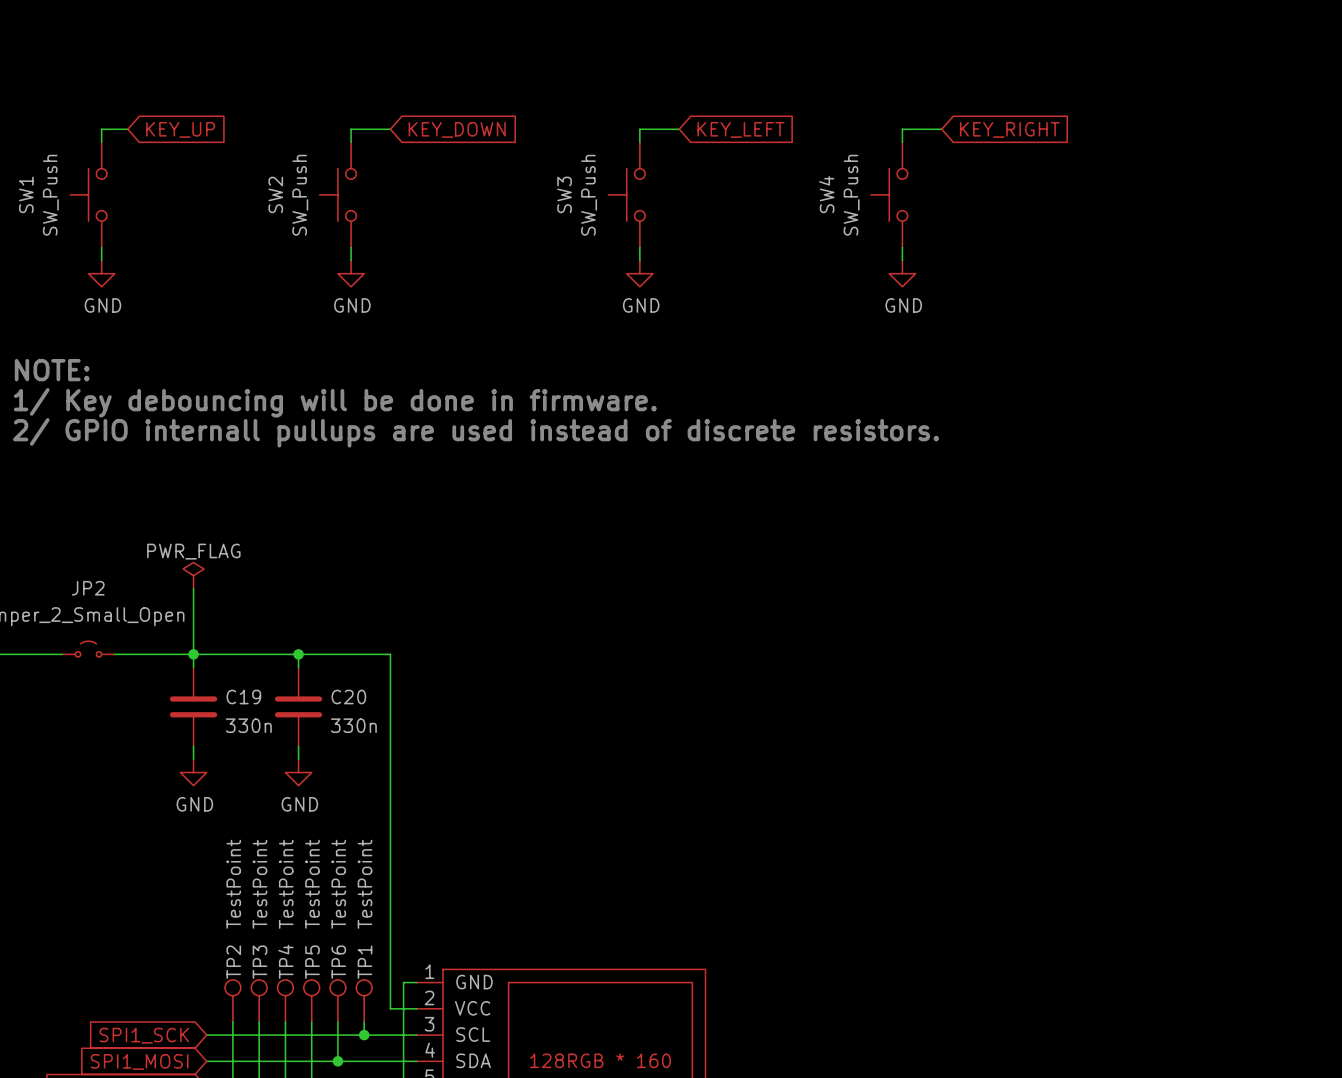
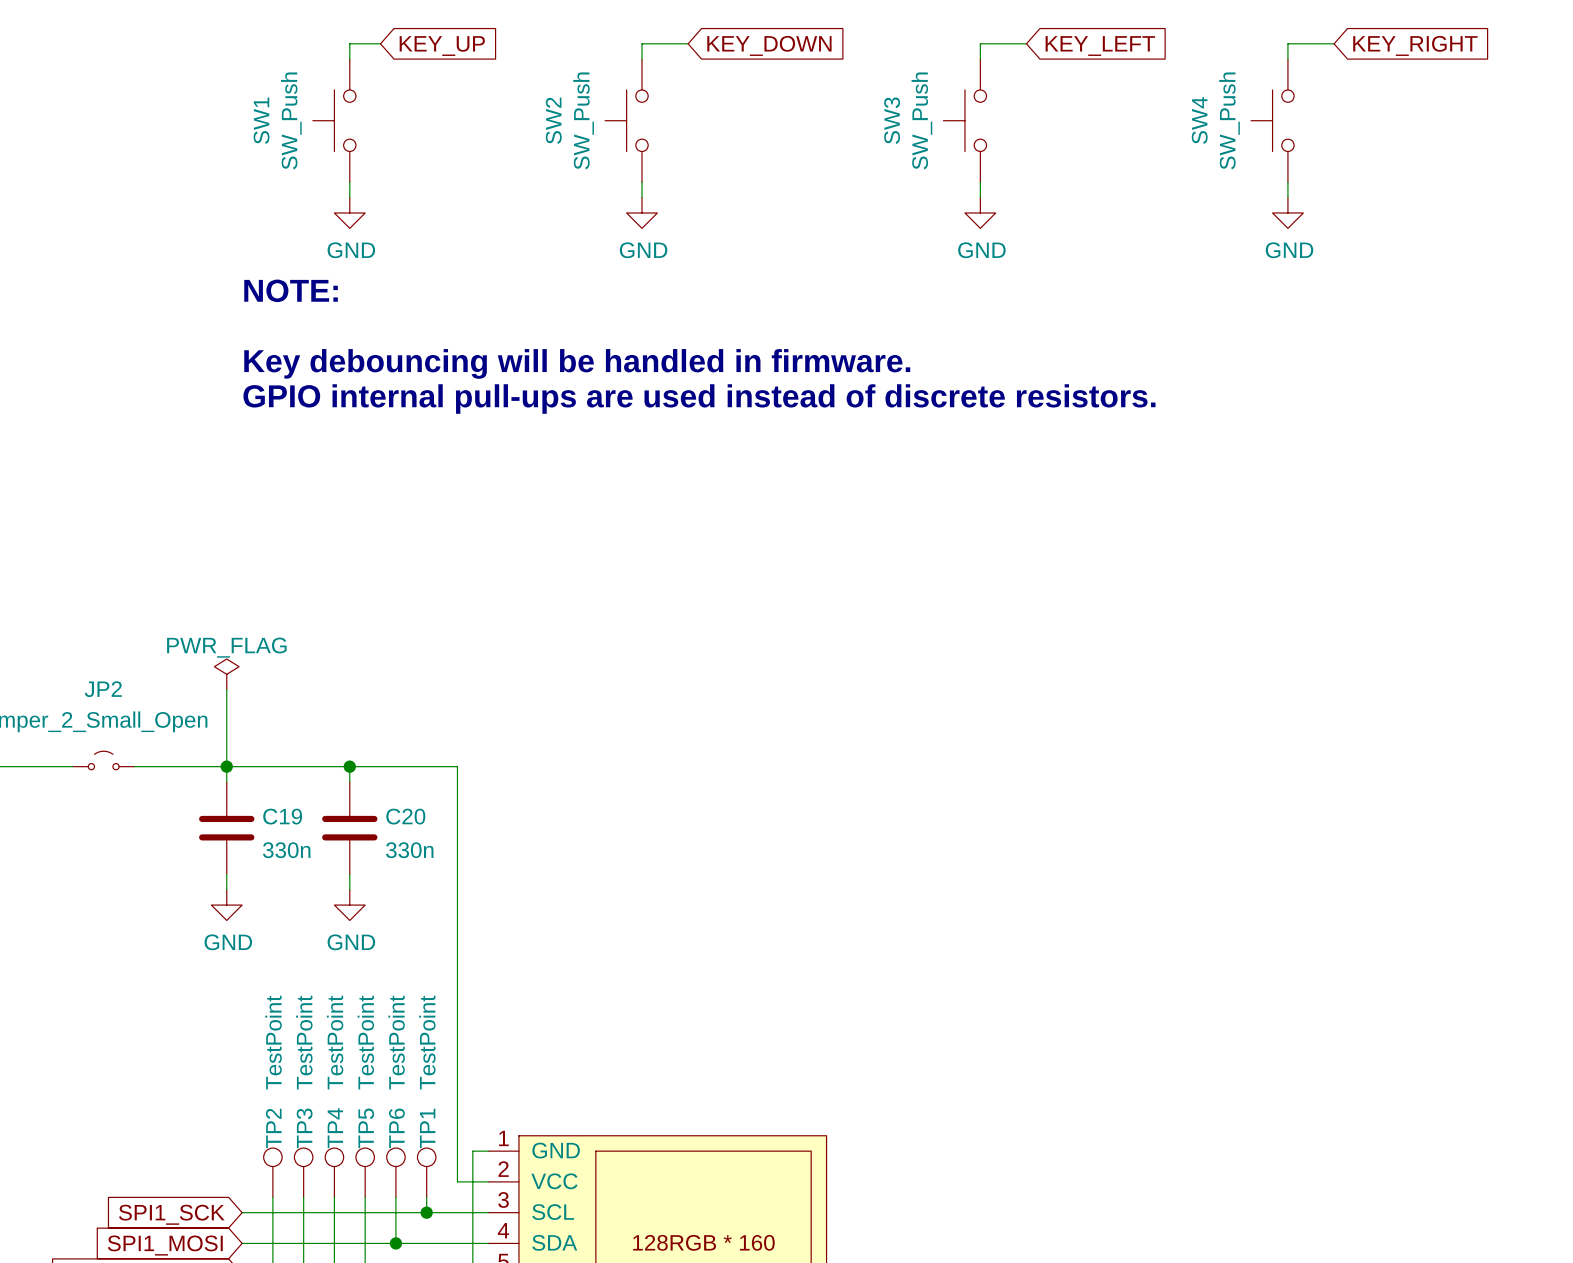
wire: (127, 129) (101, 129) (101, 142) -> (380, 43) (349, 43) (349, 59)
global label position: KEY_UP (180, 129) -> KEY_UP (442, 46)
wire: (390, 129) (351, 129) (351, 142) -> (688, 43) (642, 43) (642, 59)
global label position: KEY_DOWN (457, 129) -> KEY_DOWN (769, 45)
wire: (679, 129) (639, 129) (639, 142) -> (1026, 43) (980, 43) (980, 59)
global label position: KEY_LEFT (741, 129) -> KEY_LEFT (1100, 46)
wire: (941, 129) (902, 129) (902, 142) -> (1334, 43) (1287, 43) (1287, 59)
global label position: KEY_RIGHT (1009, 129) -> KEY_RIGHT (1415, 45)
power symbol: none -> GND (642, 212)
power symbol: none -> GND (980, 212)
power symbol: none -> GND (1287, 212)
SW1 position: (88, 194) -> (334, 120)
SW2 position: (337, 194) -> (626, 120)
SW3 position: (626, 194) -> (964, 120)
SW4 position: (889, 194) -> (1272, 120)
wire: (101, 247) (101, 260) -> (349, 182) (349, 197)
wire: (351, 247) (351, 260) -> (642, 182) (642, 197)
wire: (639, 247) (639, 260) -> (980, 182) (980, 197)
wire: (902, 247) (902, 260) -> (1287, 182) (1287, 197)
power symbol: GND (101, 273) -> none
power symbol position: GND (351, 273) -> GND (349, 212)
power symbol: GND (639, 273) -> none
power symbol: GND (902, 273) -> none
text: none -> Key debouncing will be handled in firmware. (577, 363)
text: none -> GPIO internal pull-ups are used instead of discrete resistors. (699, 399)
text position: NOTE: (52, 370) -> NOTE: (291, 290)
text: 1/ Key debouncing will be done in firmware. (335, 402) -> none
text: 2/ GPIO internall pullups are used instead of discrete resistors. (476, 432) -> none

